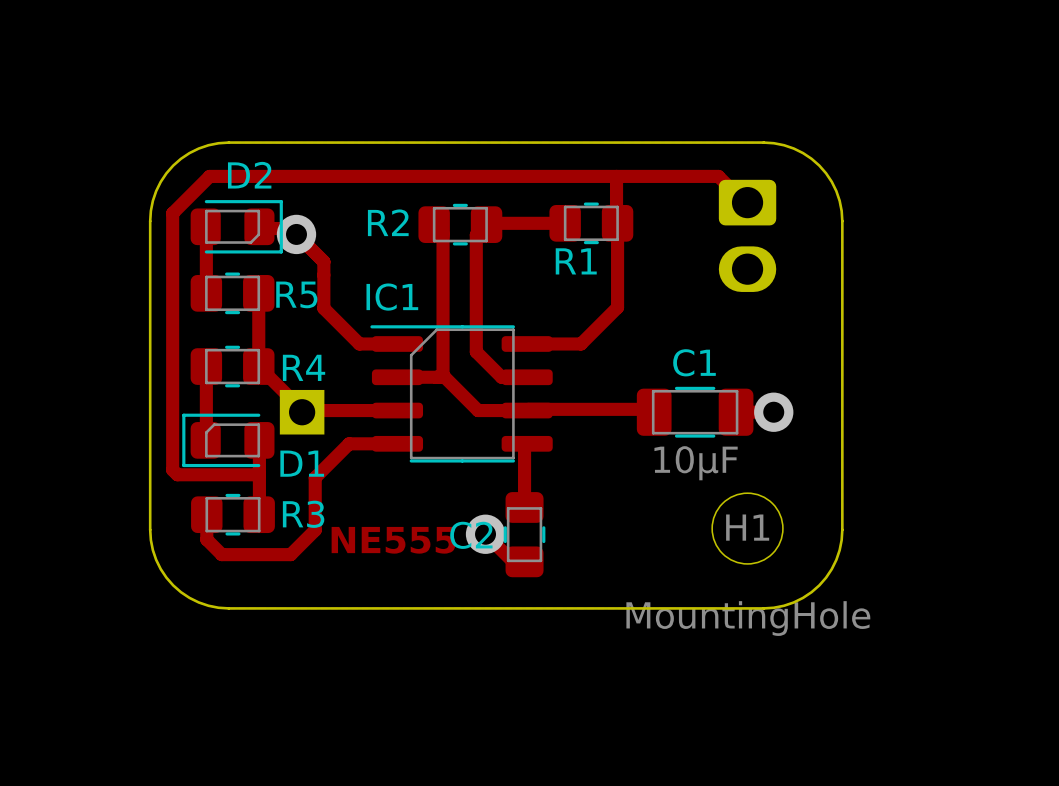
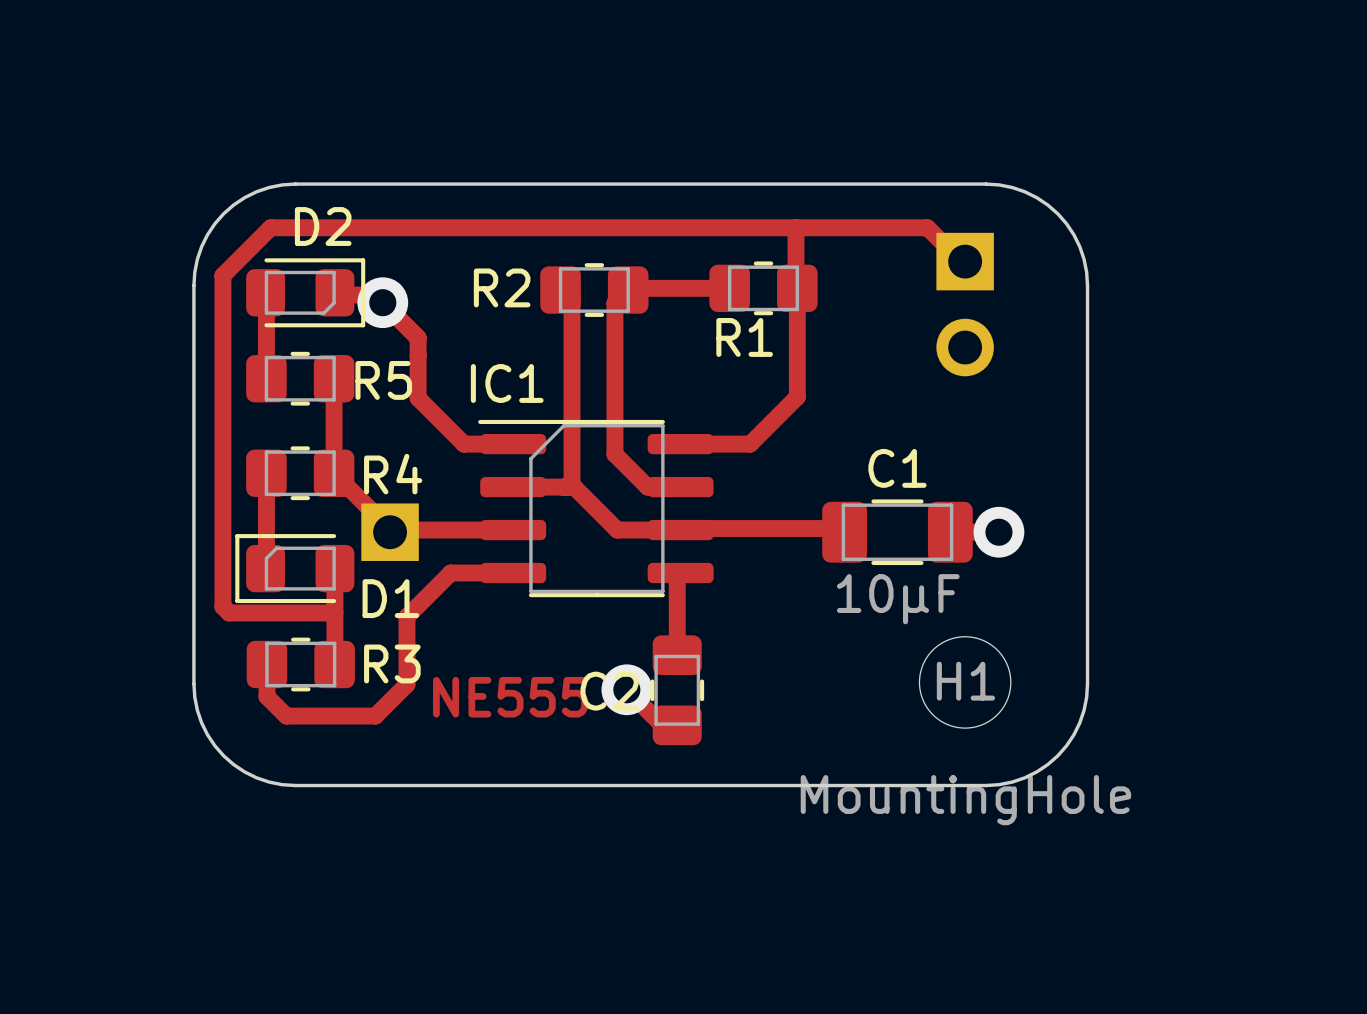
part footprint: [718, 179, 777, 292] -> [936, 232, 994, 377]

